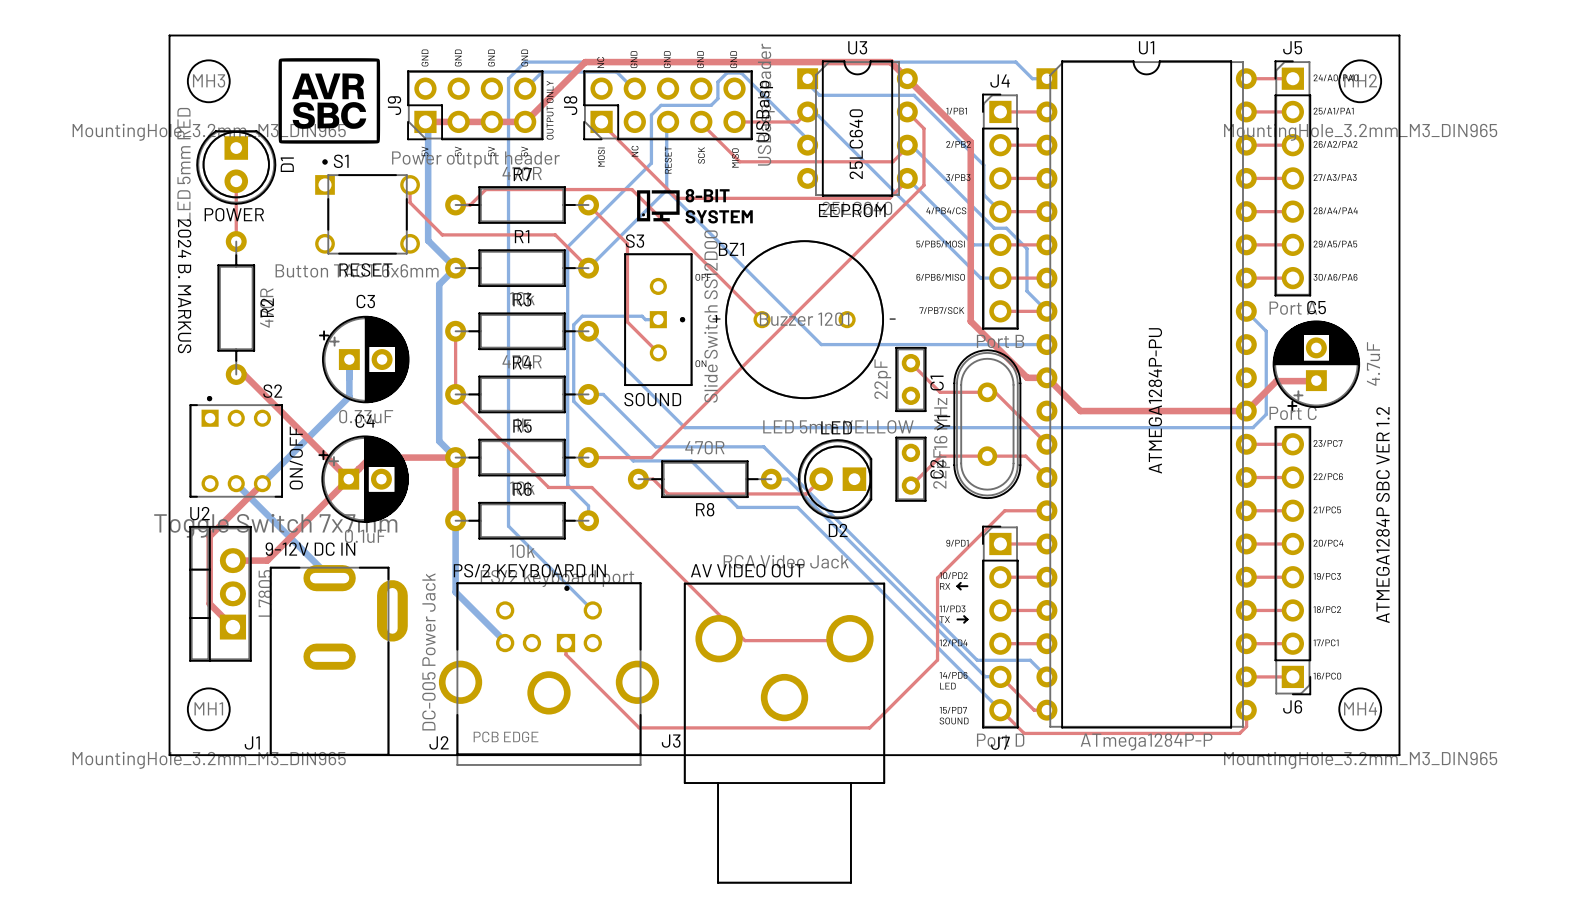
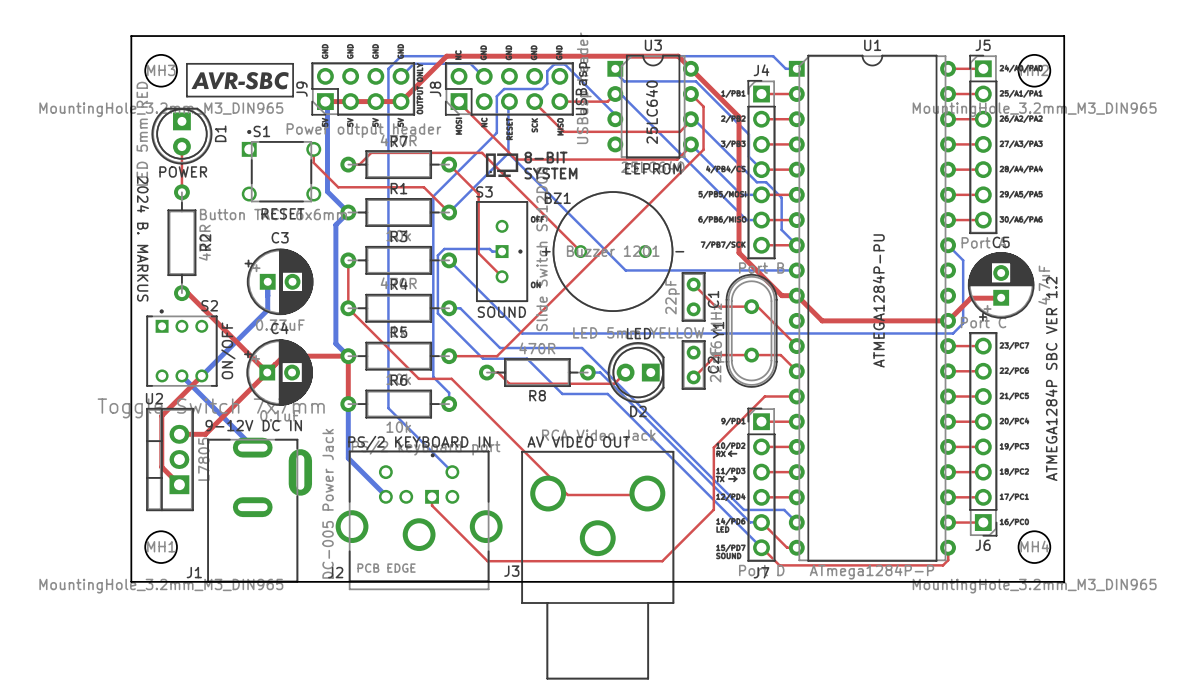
drawing: [278, 58, 381, 144] -> none
line: none -> (186, 63) (293, 63) (293, 96) (186, 96) (186, 63)
drawing: none -> [191, 72, 289, 90]

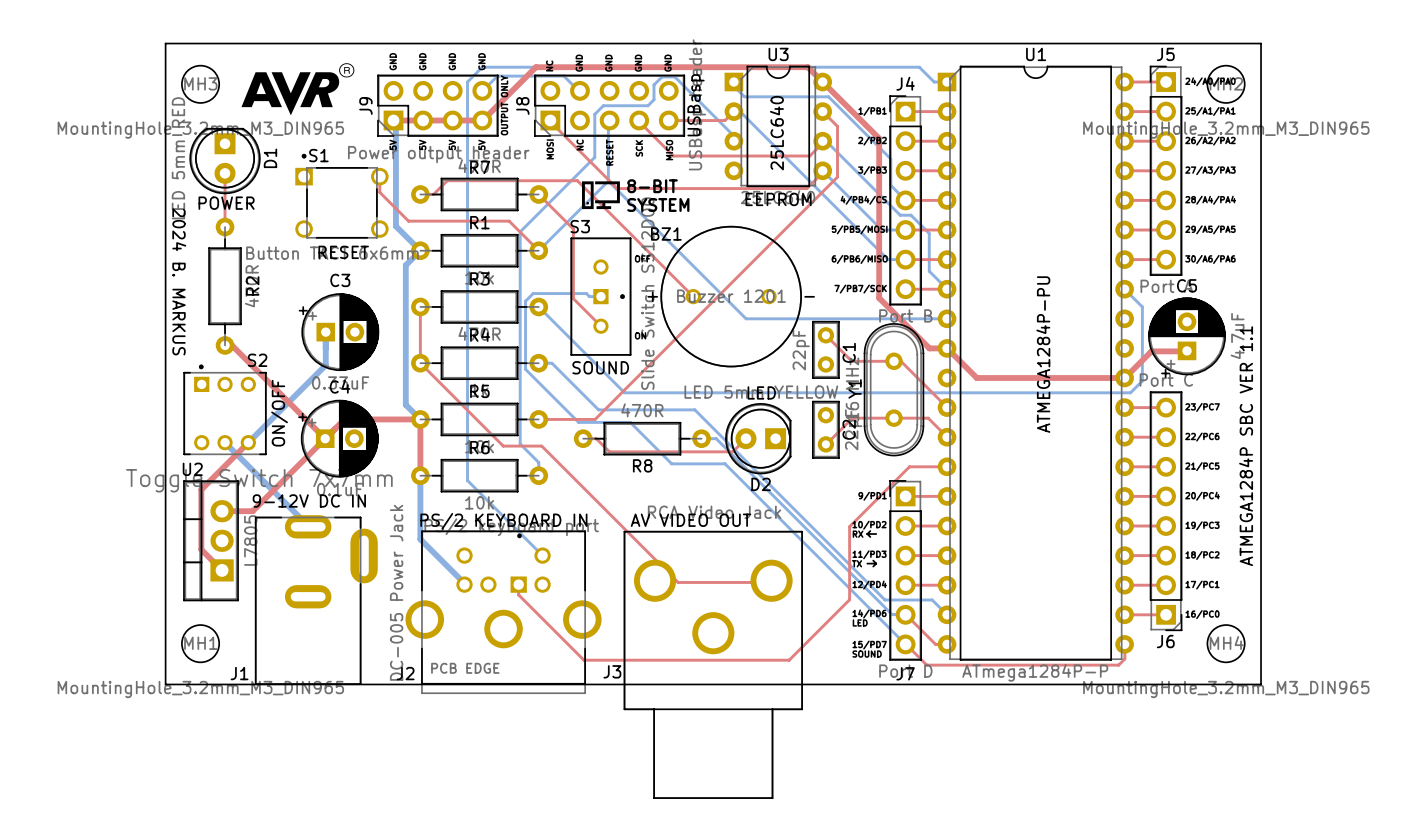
line: (186, 63) (293, 63) (293, 96) (186, 96) (186, 63) -> none
drawing shape: [191, 72, 289, 90] -> [241, 63, 355, 116]
text: ATMEGA1284P SBC VER 1.2 (1051, 378) -> ATMEGA1284P SBC VER 1.1 (1246, 446)

